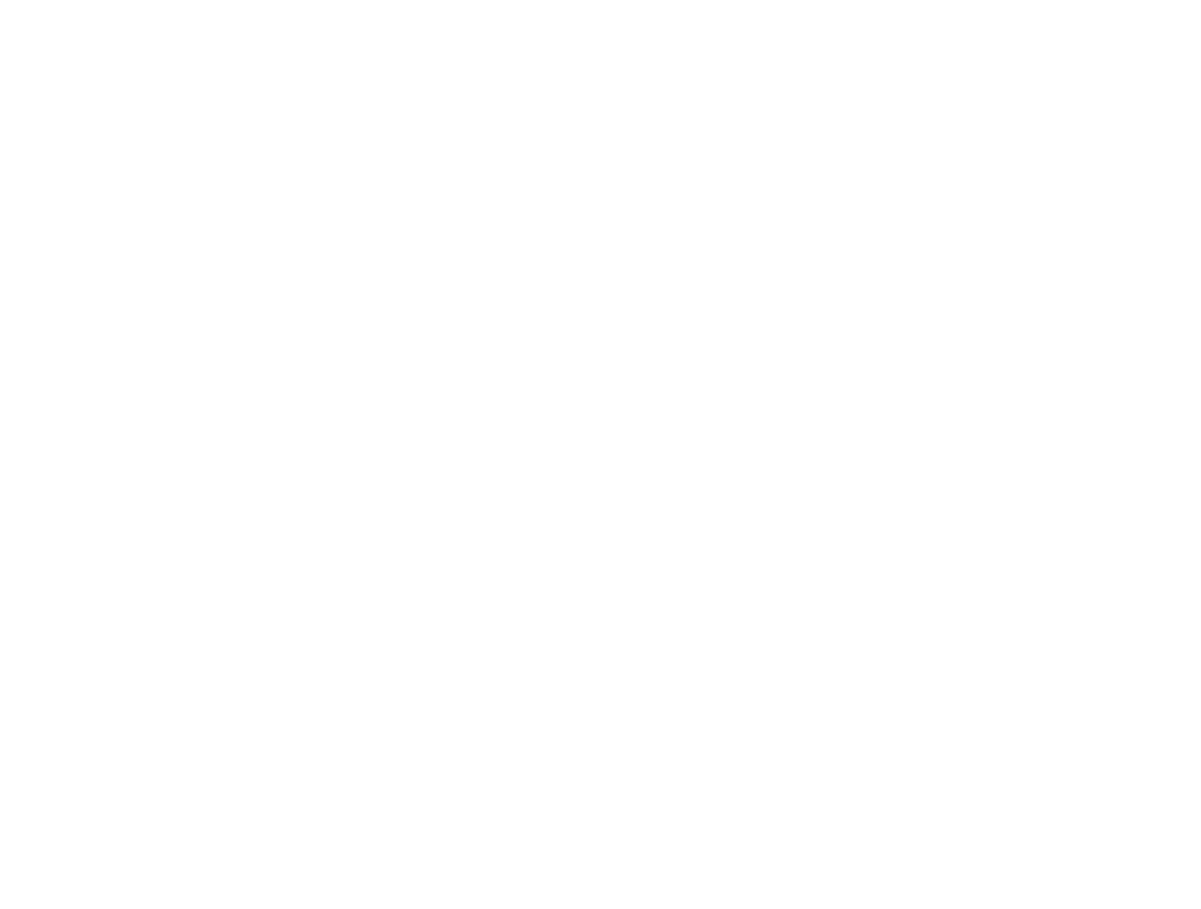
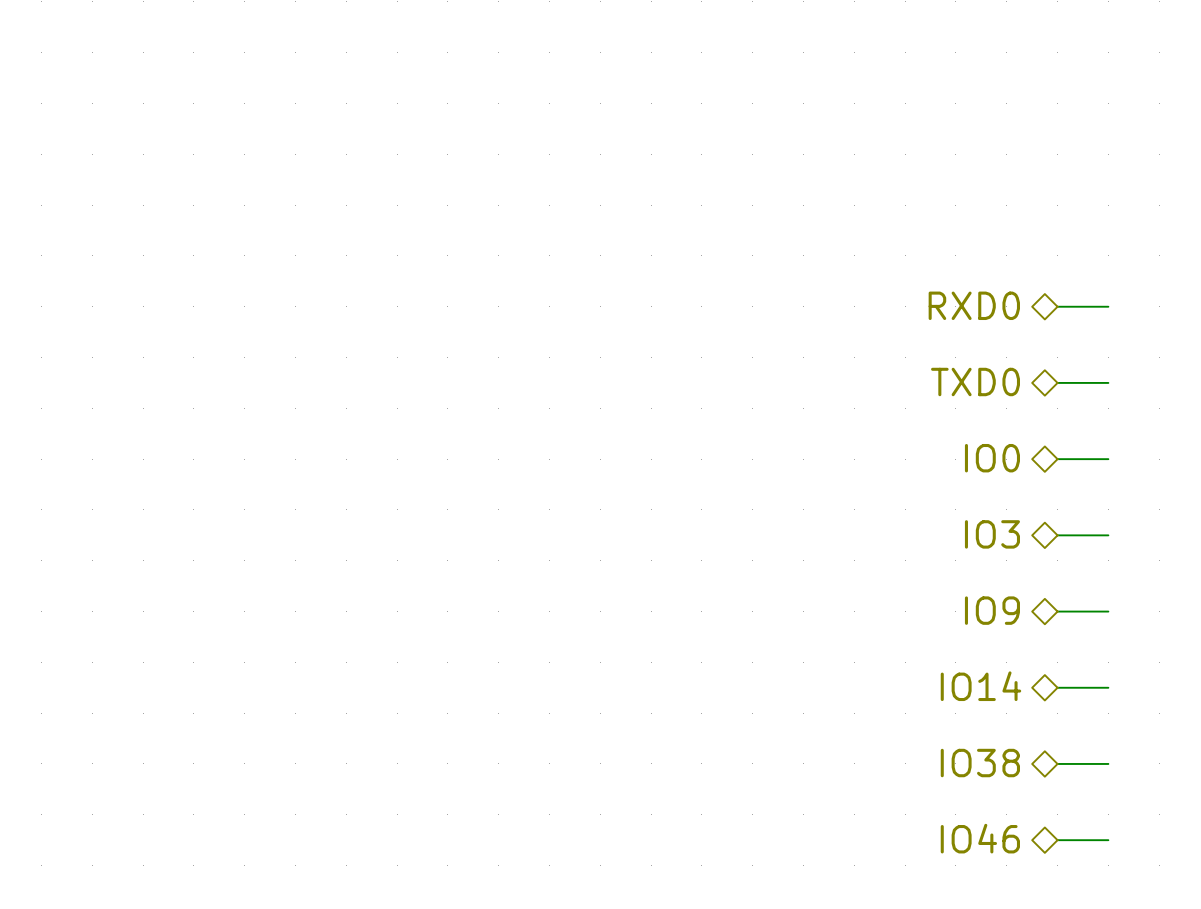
hierarchical label: none -> RXD0 (974, 305)
wire: none -> (1057, 306) (1108, 306)
hierarchical label: none -> TXD0 (975, 381)
wire: none -> (1057, 382) (1108, 382)
hierarchical label: none -> IO0 (992, 458)
wire: none -> (1057, 459) (1108, 459)
hierarchical label: none -> IO3 (992, 534)
wire: none -> (1057, 535) (1108, 535)
hierarchical label: none -> IO9 (992, 610)
wire: none -> (1057, 611) (1108, 611)
hierarchical label: none -> IO14 (980, 686)
wire: none -> (1057, 687) (1108, 687)
hierarchical label: none -> IO38 (980, 763)
wire: none -> (1057, 763) (1108, 763)
hierarchical label: none -> IO46 (980, 838)
wire: none -> (1057, 840) (1108, 840)

